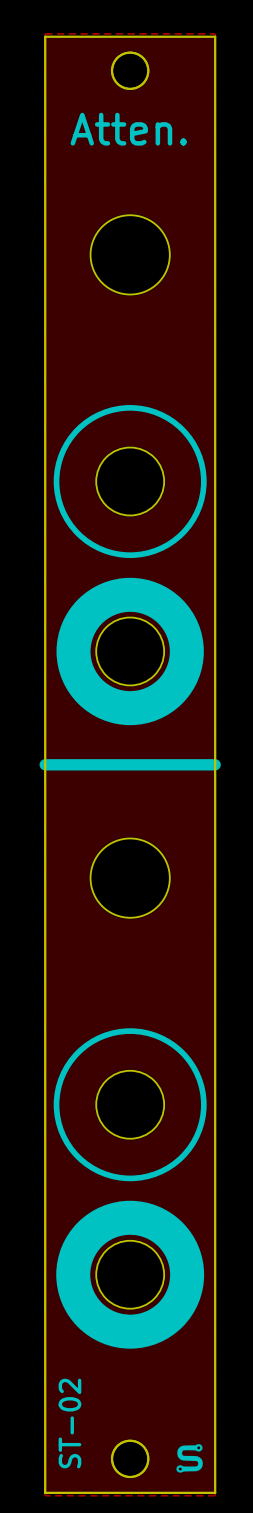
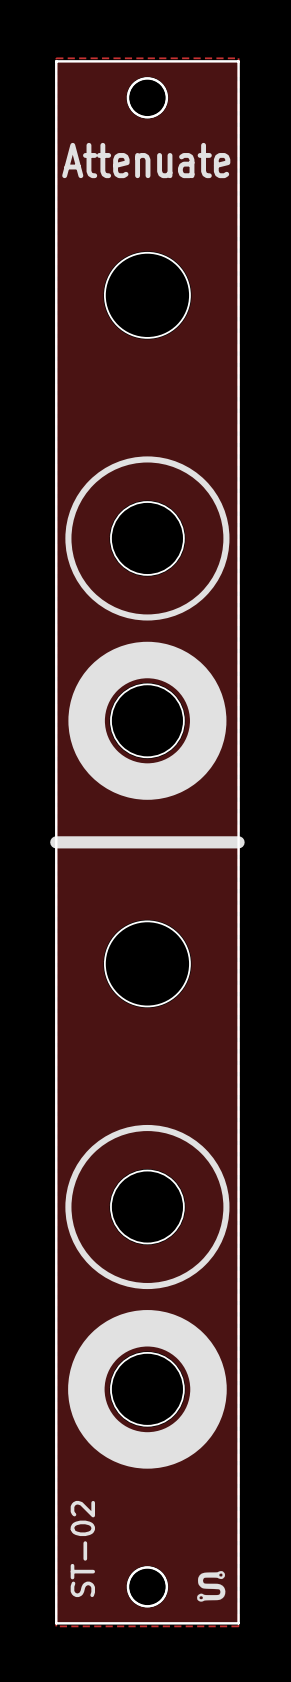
text: Atten. (128, 129) -> Attenuate (146, 160)

